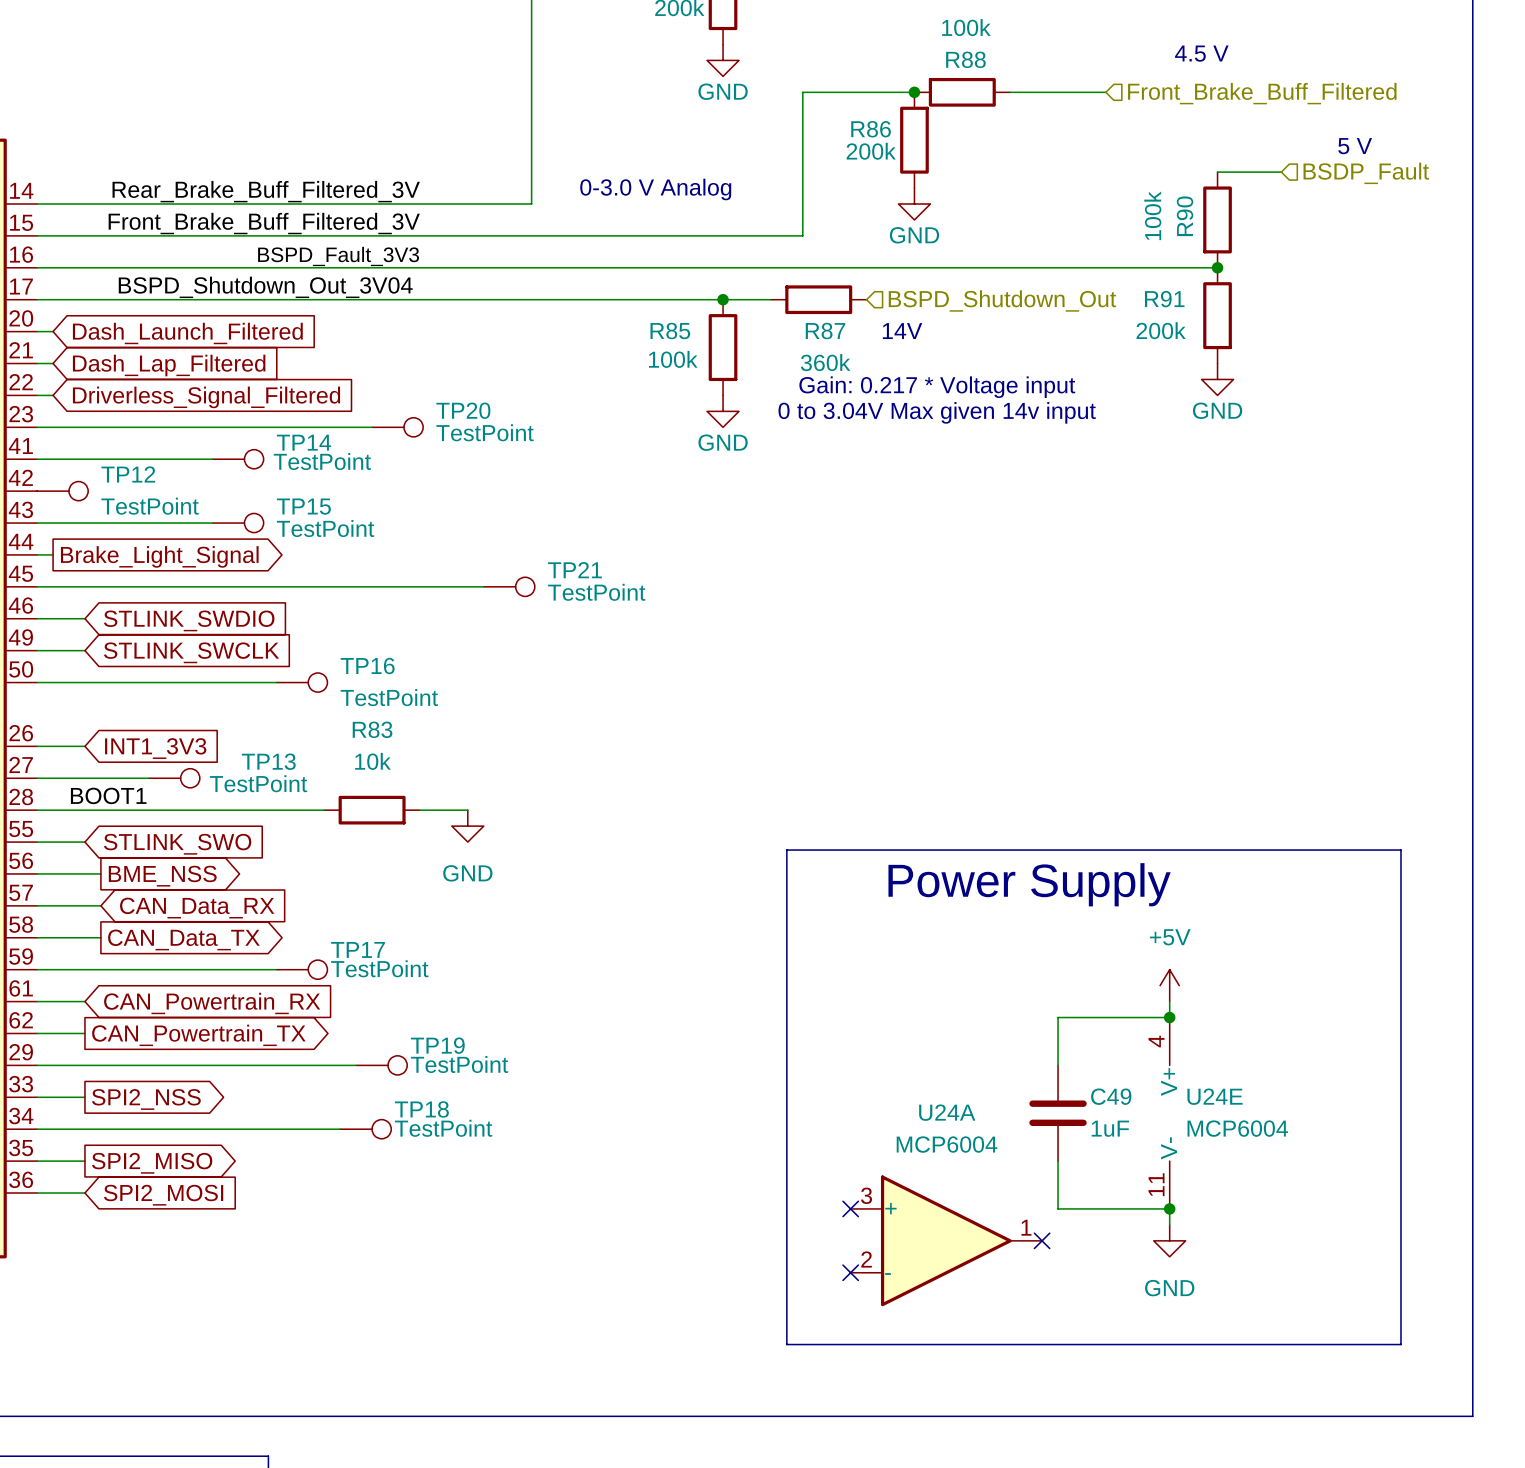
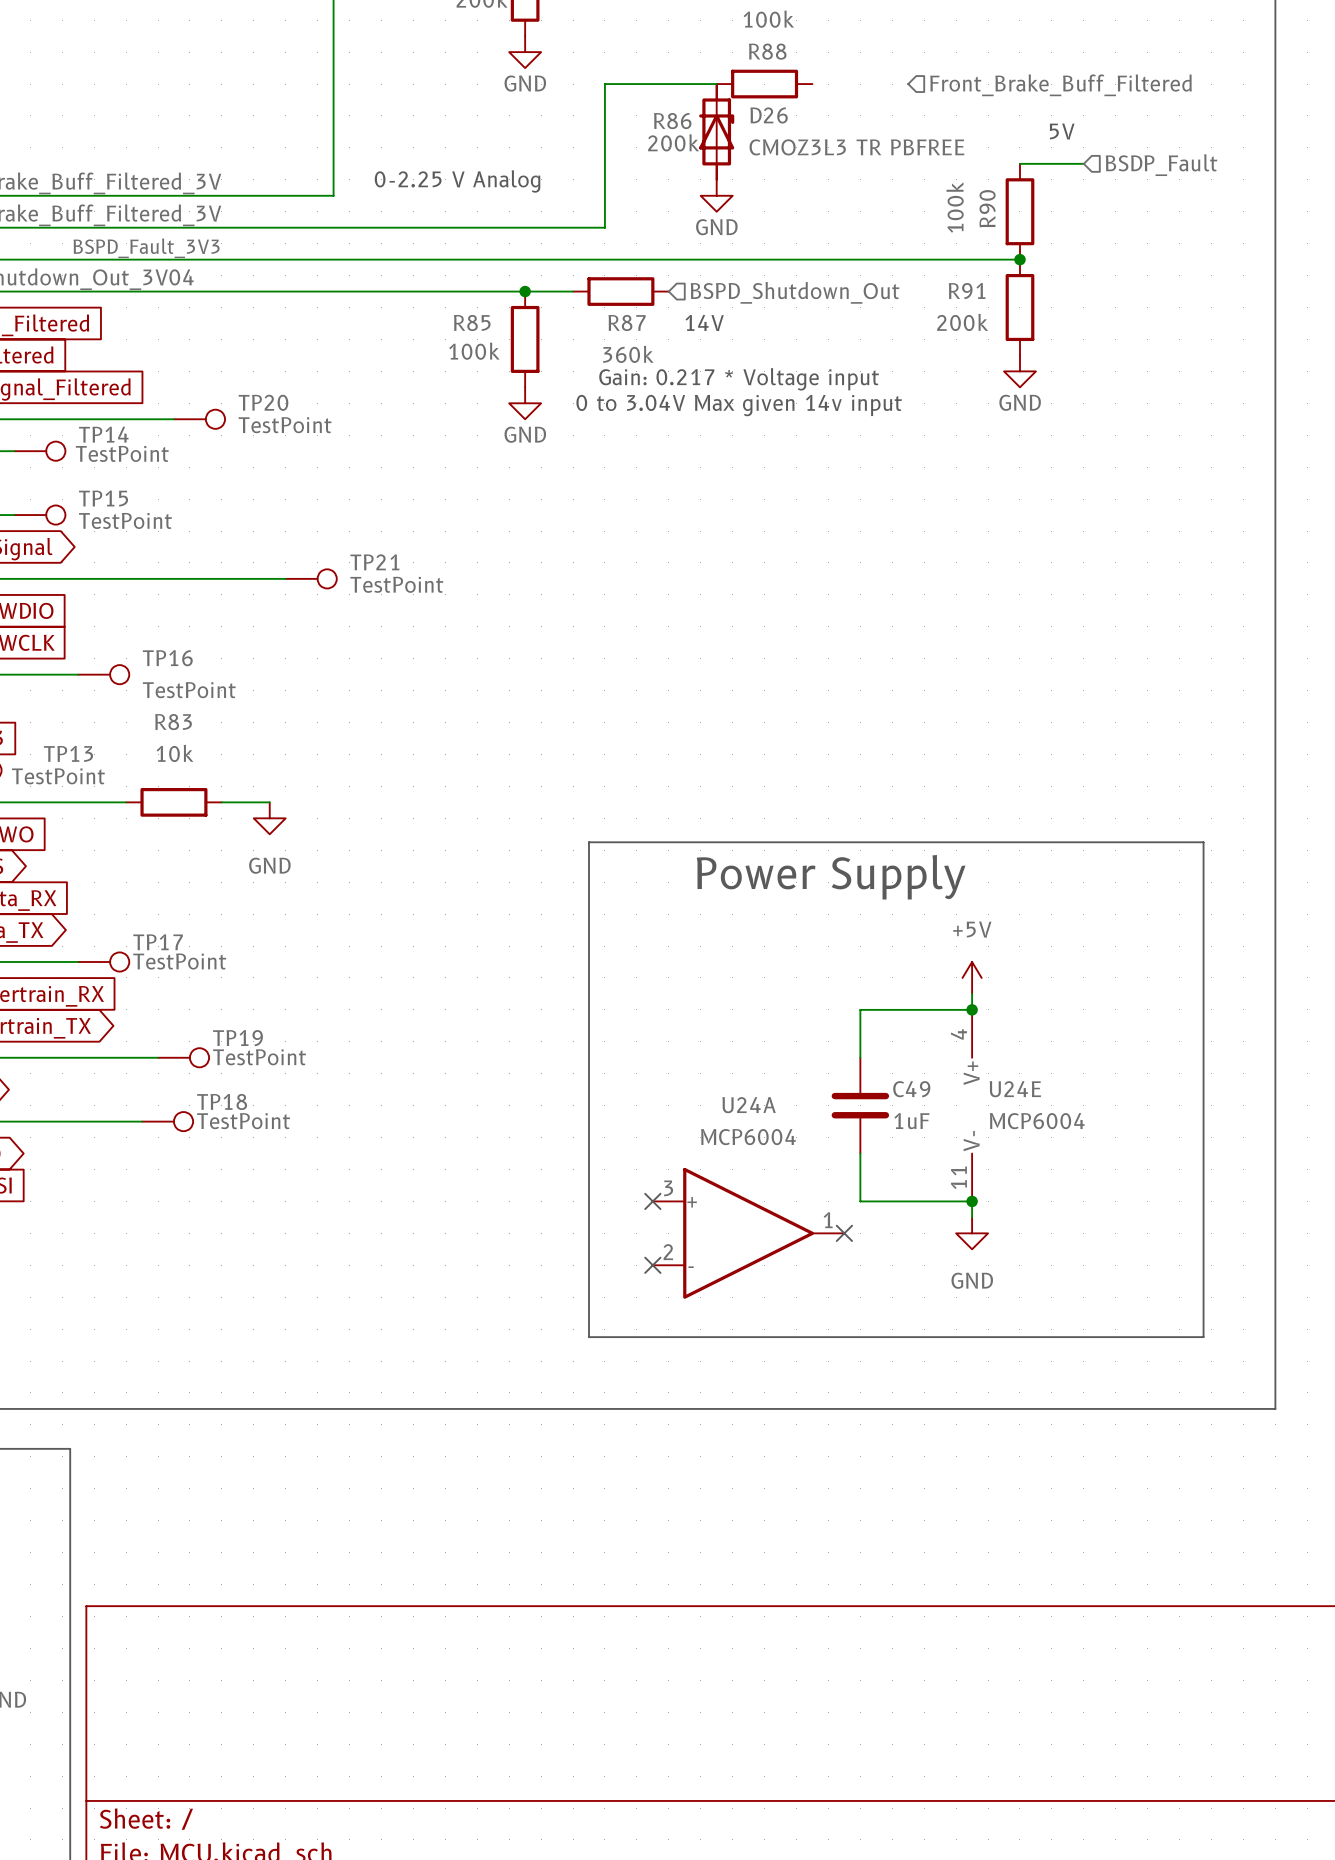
text: 4.5 V (1201, 53) -> none
junction: (914, 92) -> none
wire: (1010, 92) (1105, 92) -> none
text: none -> 5V (1062, 131)
D26: none -> CMOZ3L3 TR PBFREE (716, 131)
text: 5 V (1355, 146) -> none
text: 0-3.0 V Analog (655, 189) -> 0-2.25 V Analog (457, 181)

